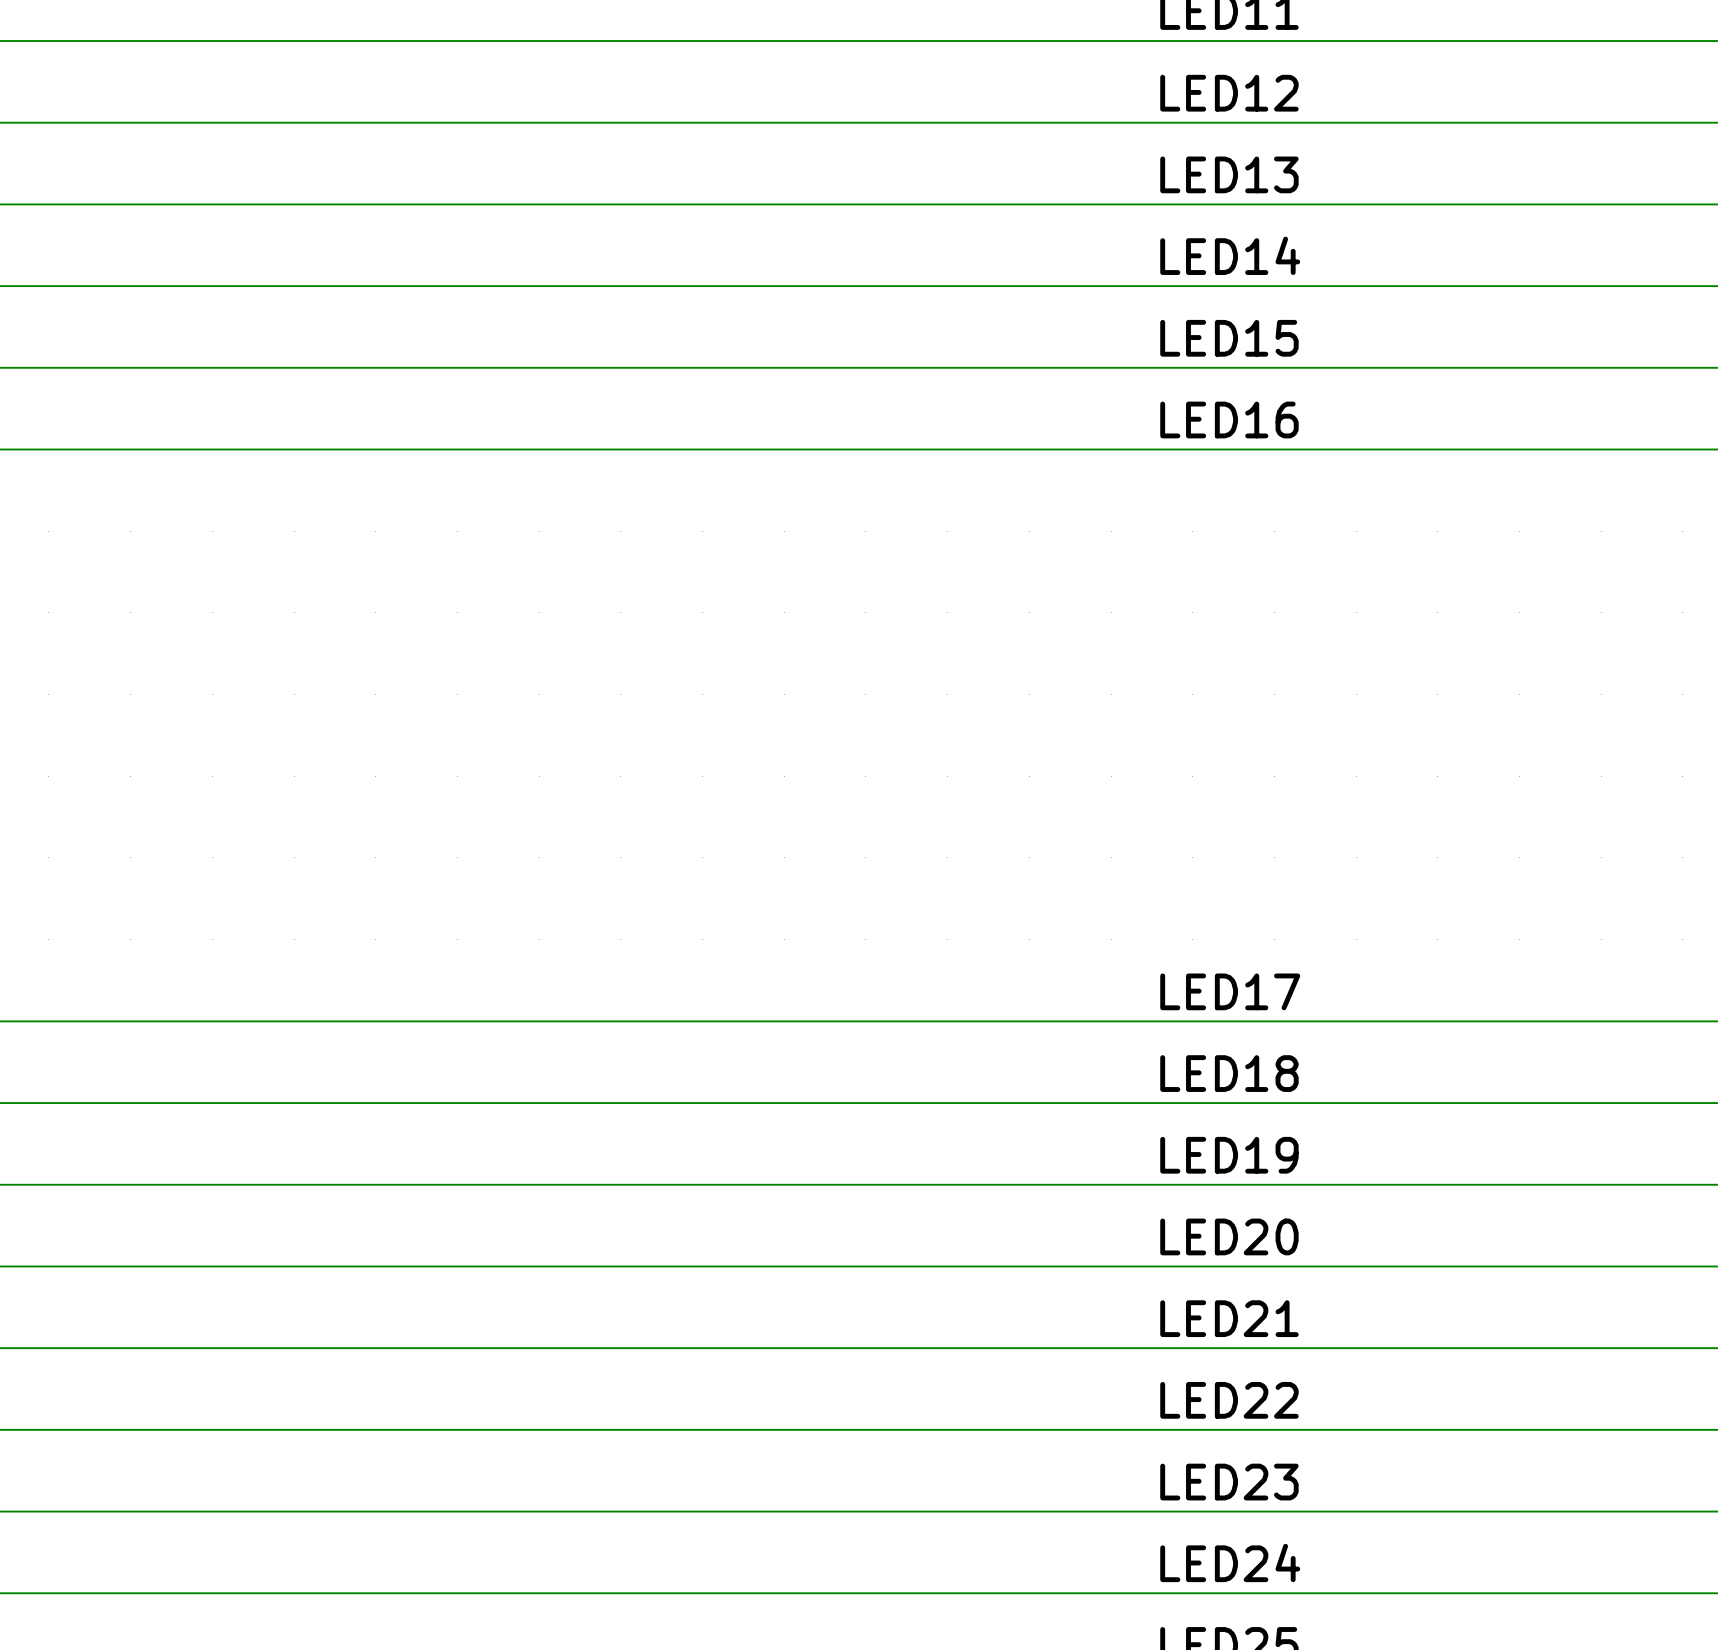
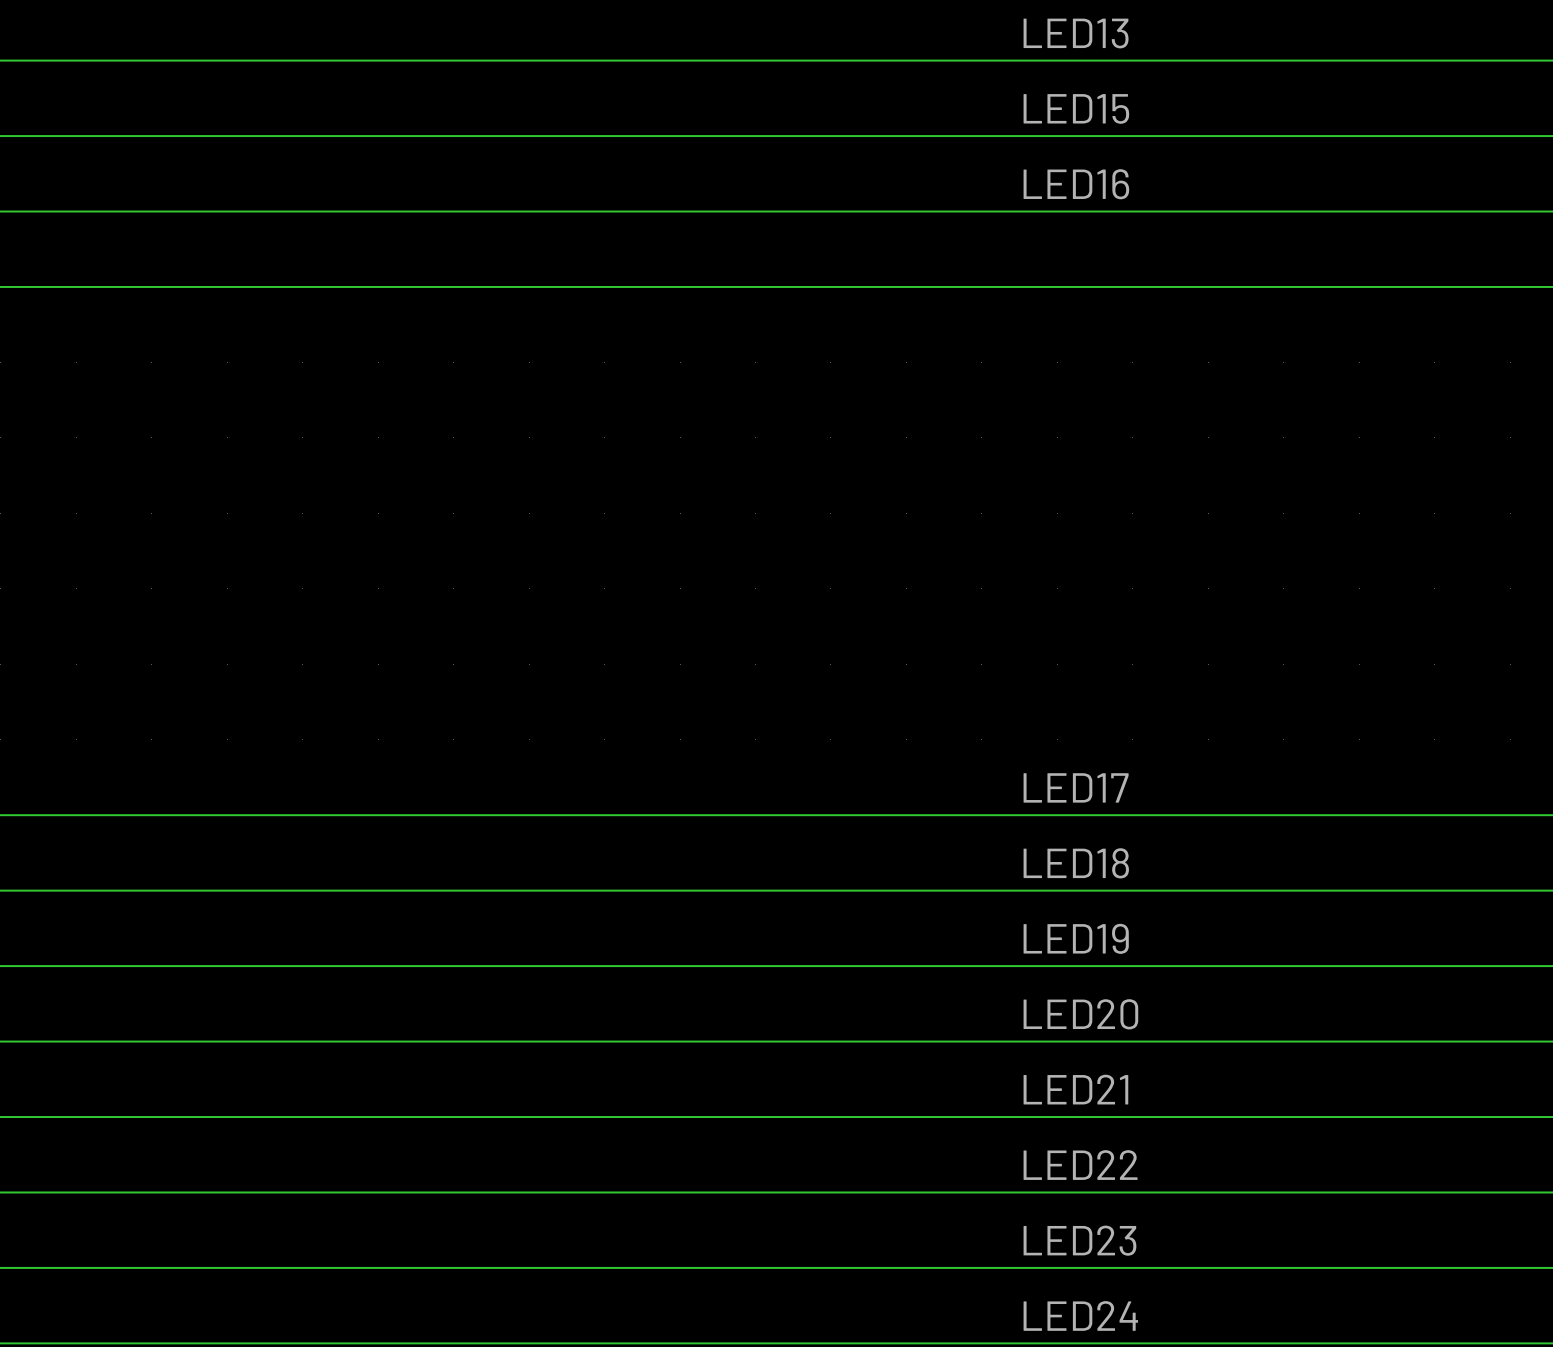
label: LED14 (1230, 255) -> LED15 (1076, 108)
label: LED15 (1229, 338) -> LED16 (1076, 184)
label: LED16 (1229, 419) -> none

